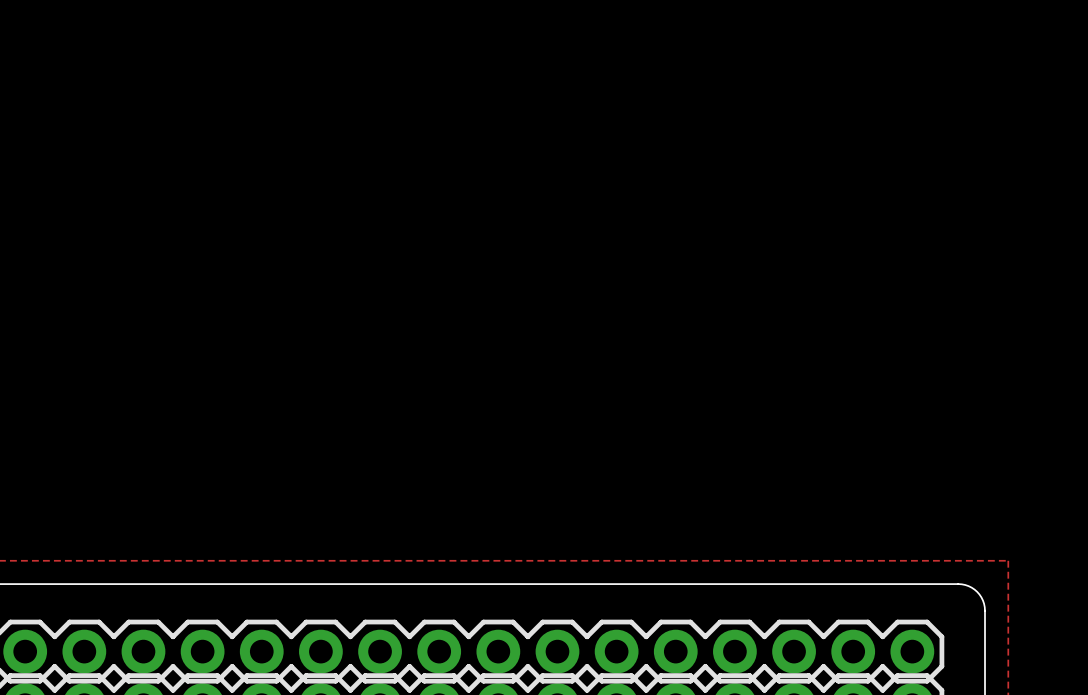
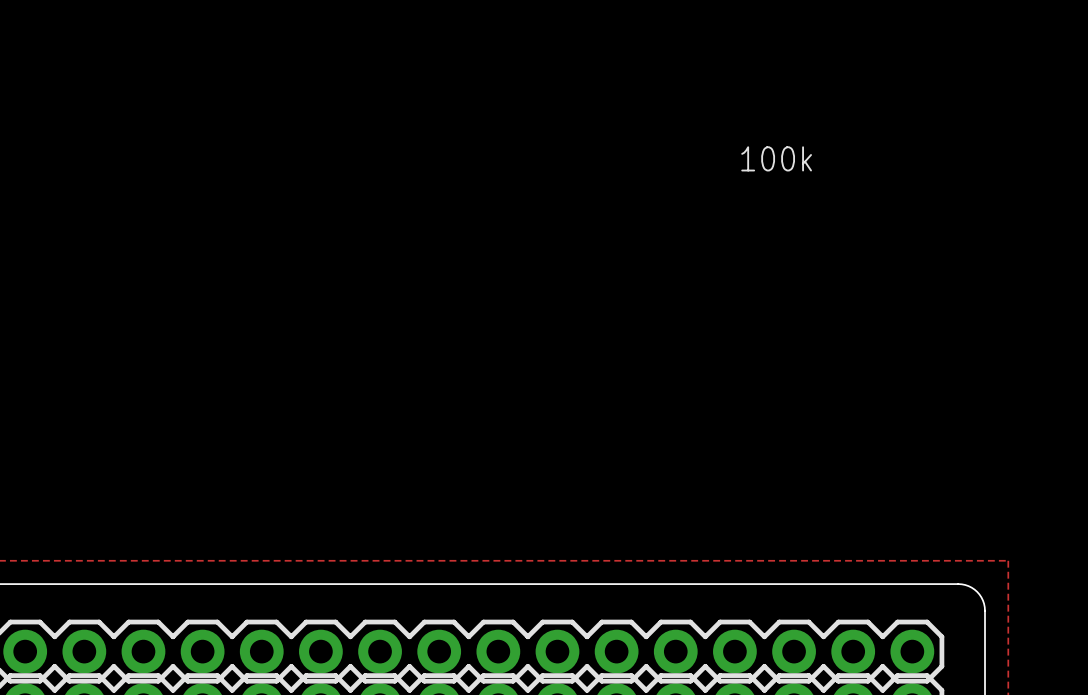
text: none -> 100k (776, 158)

